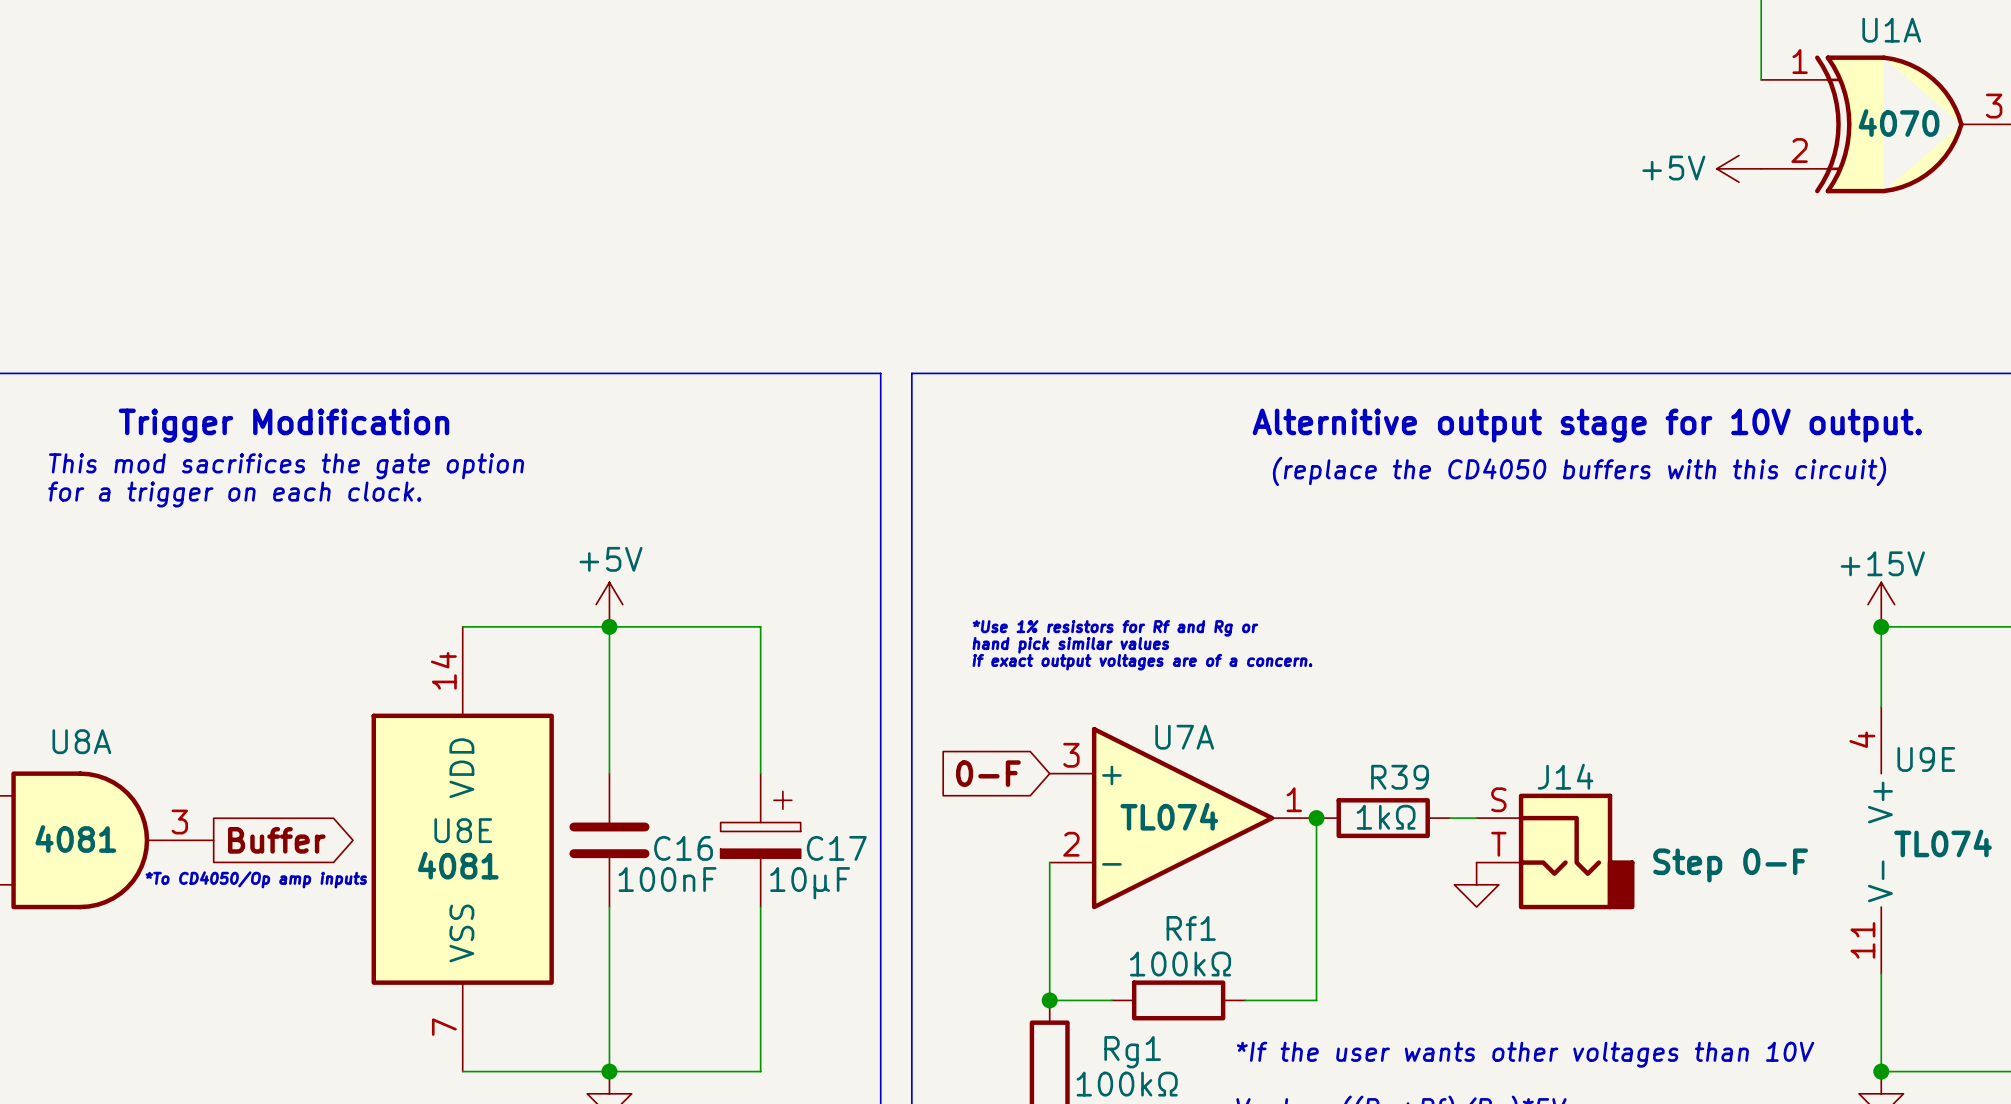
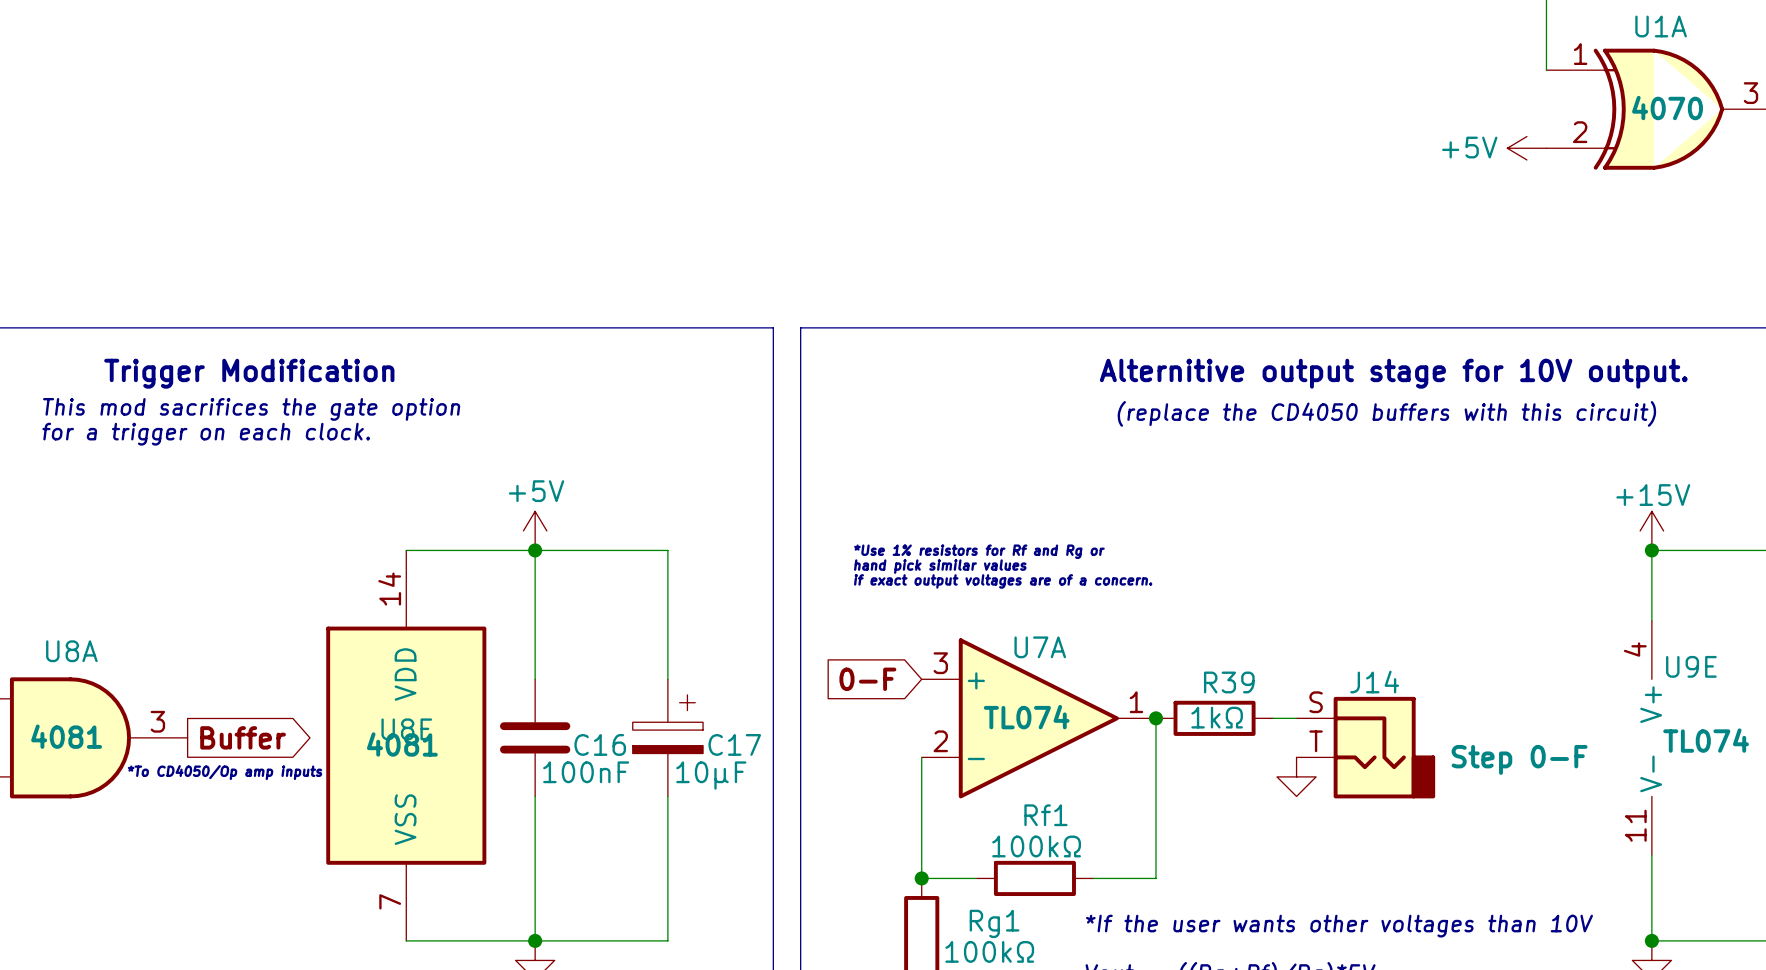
U8E value position: 4081 (458, 865) -> 4081 (402, 744)

